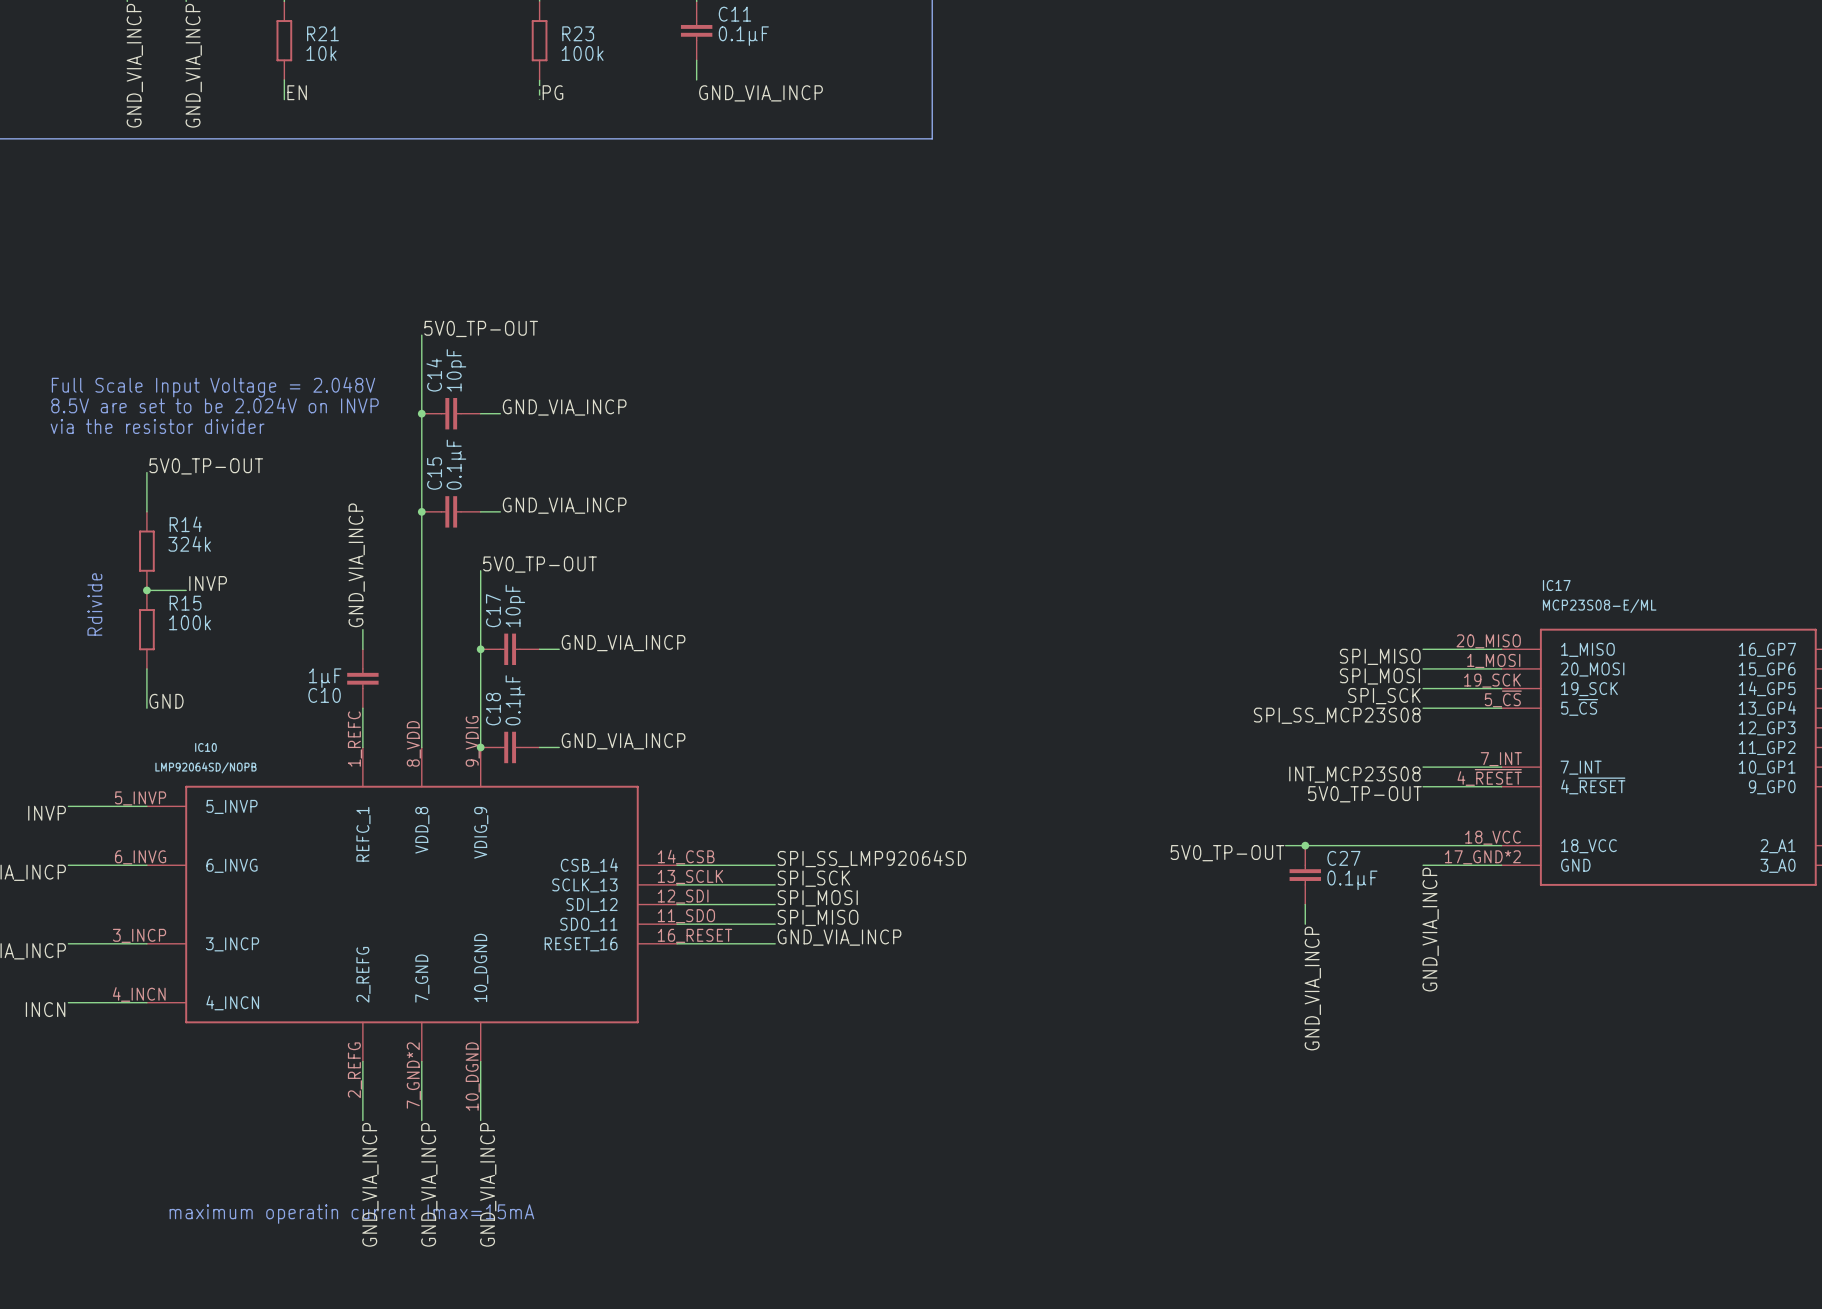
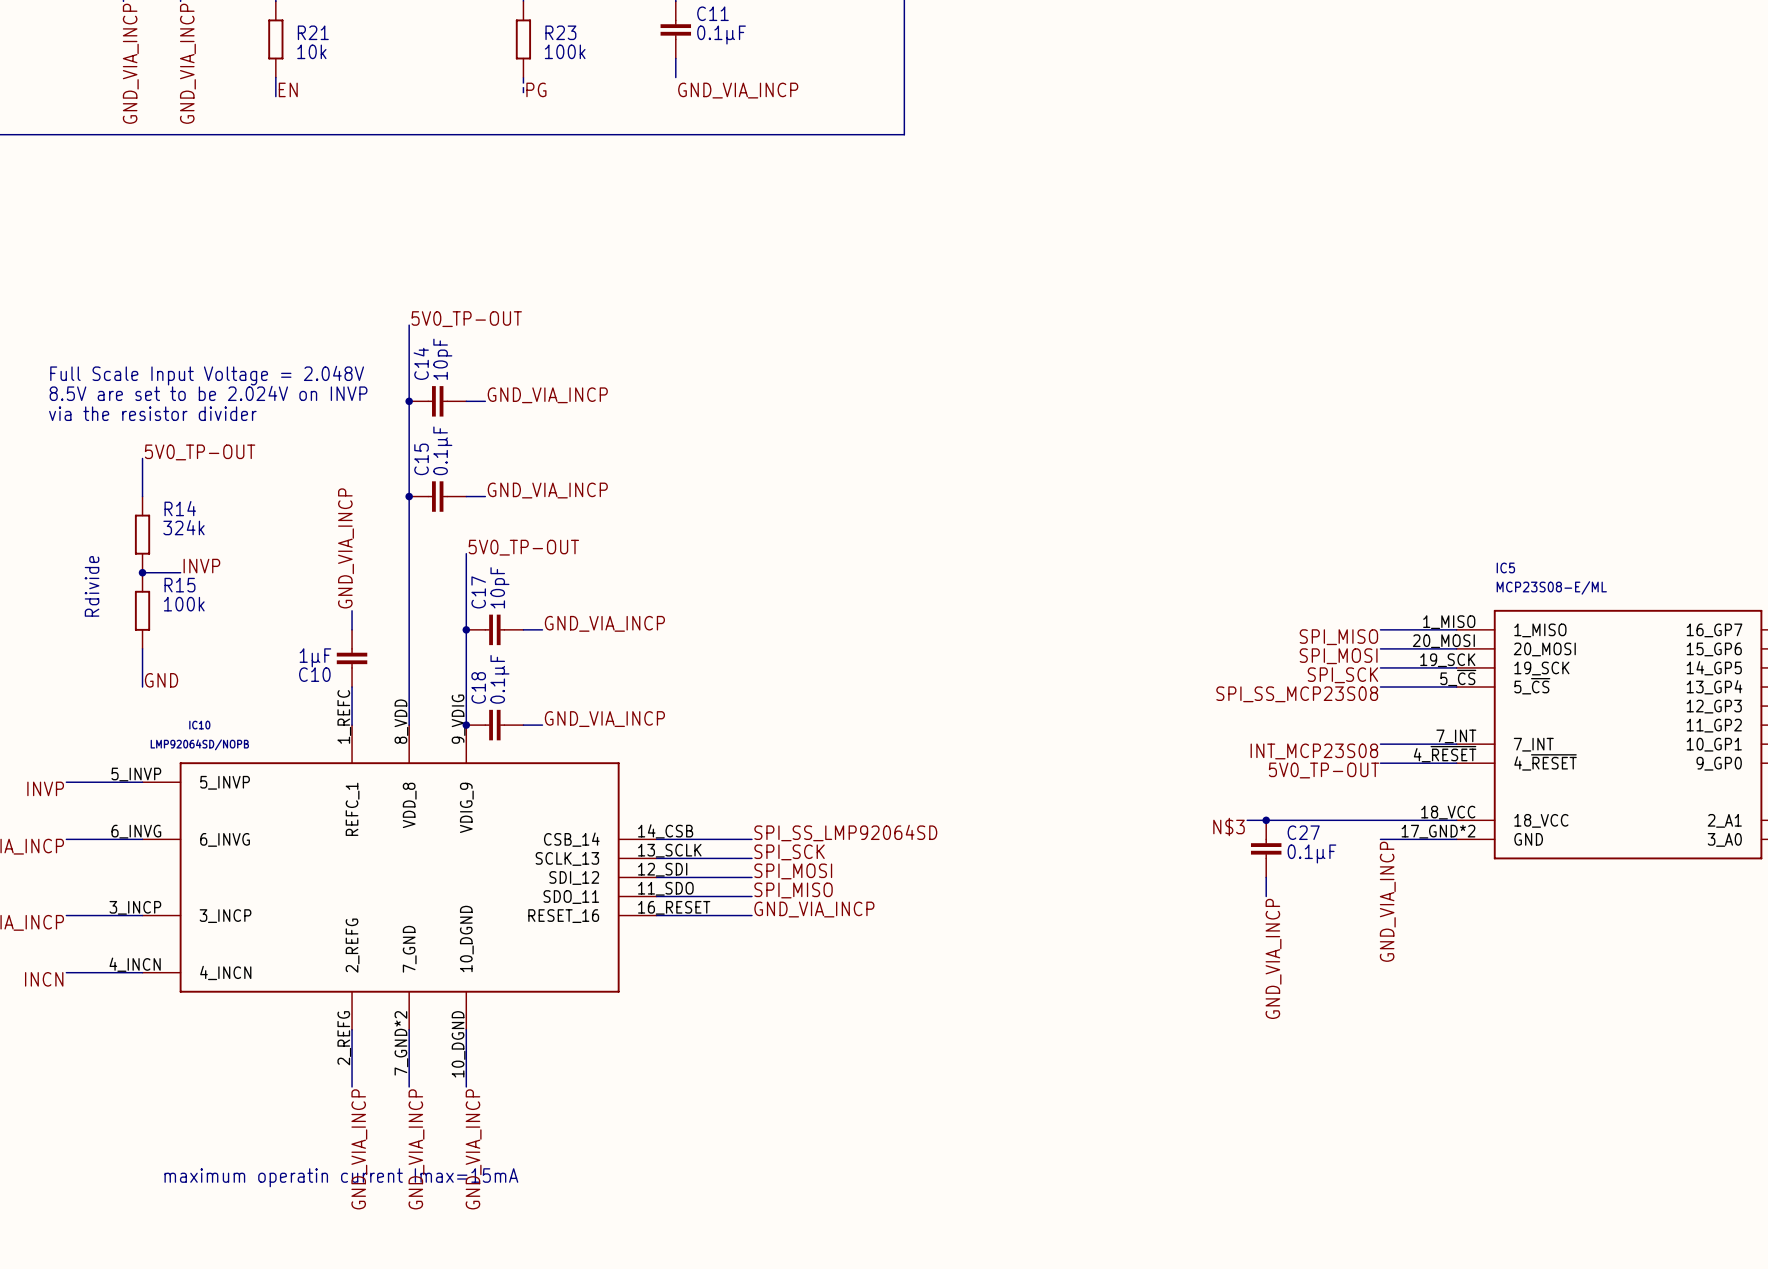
IC17 name: IC17 (1556, 585) -> IC5 (1505, 567)
IC17 pin number: 20_MISO (1488, 641) -> 1_MISO (1449, 622)
IC17 pin number: 1_MOSI (1493, 661) -> 20_MOSI (1443, 641)
label: 5V0_TP-OUT (1227, 853) -> N$3 (1229, 826)

